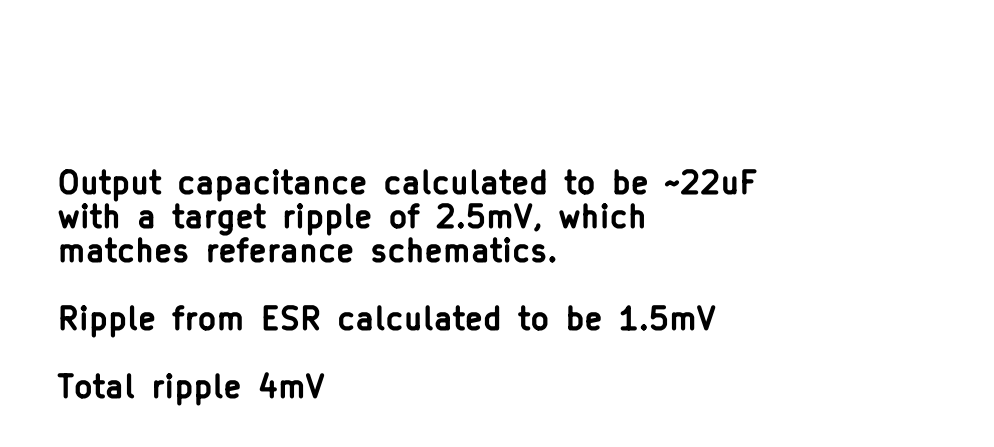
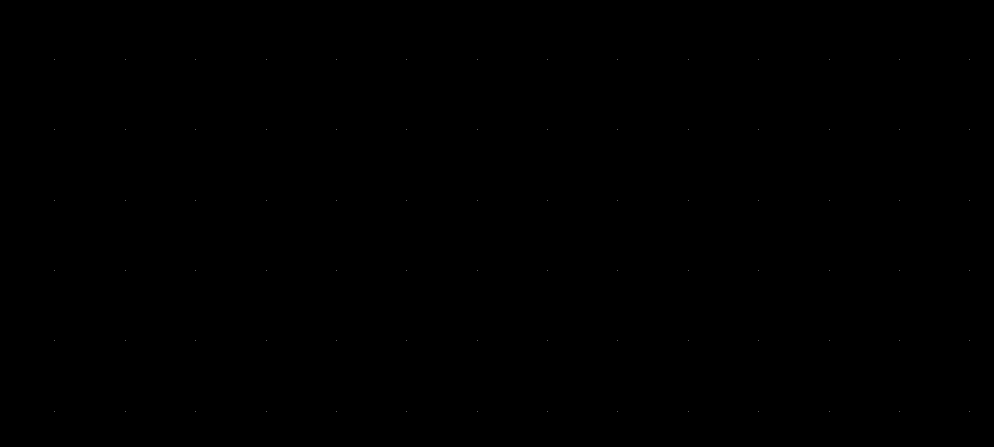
text: Output capacitance calculated to be ~22uF (408, 185) -> none
text: with a target ripple of 2.5mV, which (351, 219) -> none
text: matches referance schematics. (308, 249) -> none
text: Ripple from ESR calculated to be 1.5mV (387, 321) -> none
text: Total ripple 4mV (190, 388) -> none

